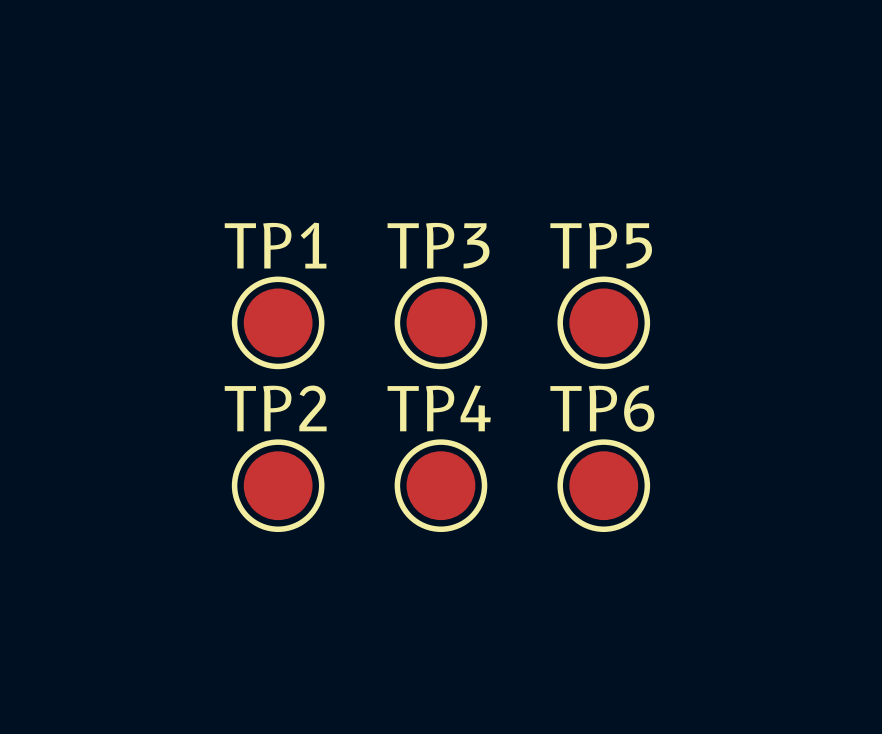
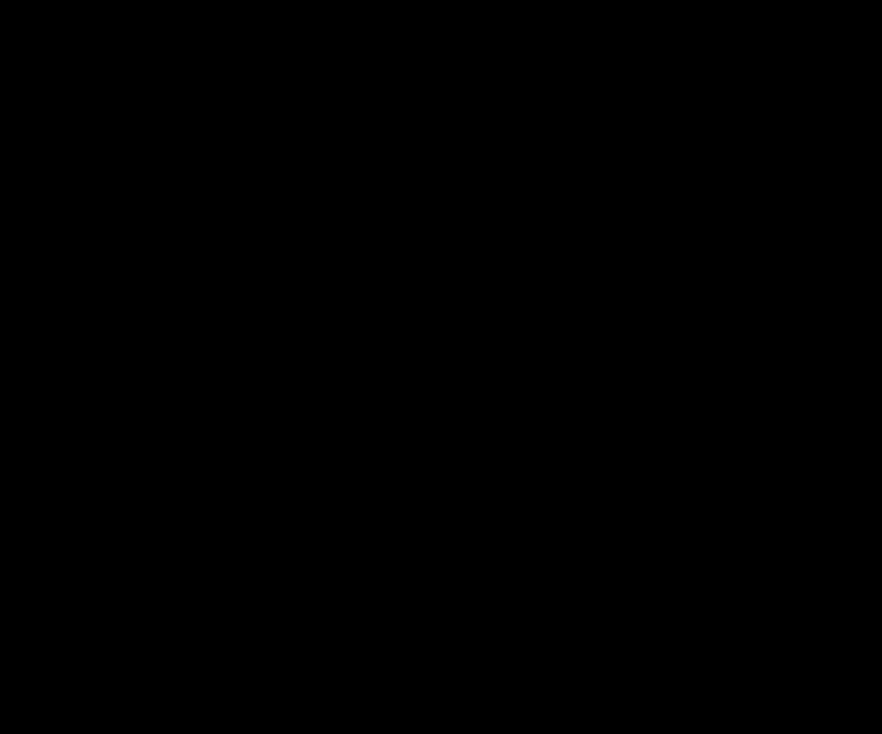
TP1: (278, 322) -> none
TP3: (440, 322) -> none
TP5: (603, 322) -> none
TP2: (278, 485) -> none
TP4: (440, 485) -> none
TP6: (603, 485) -> none

